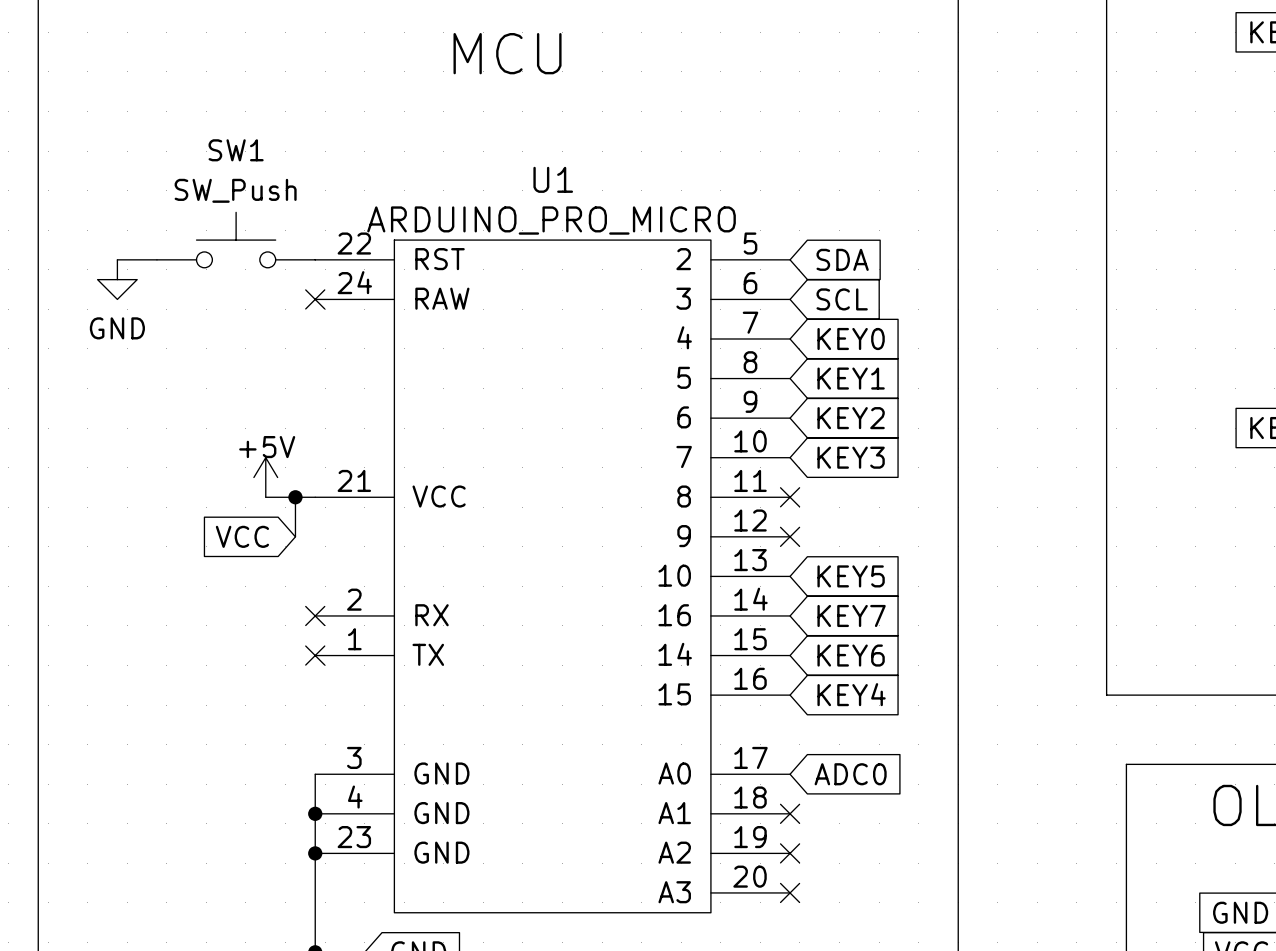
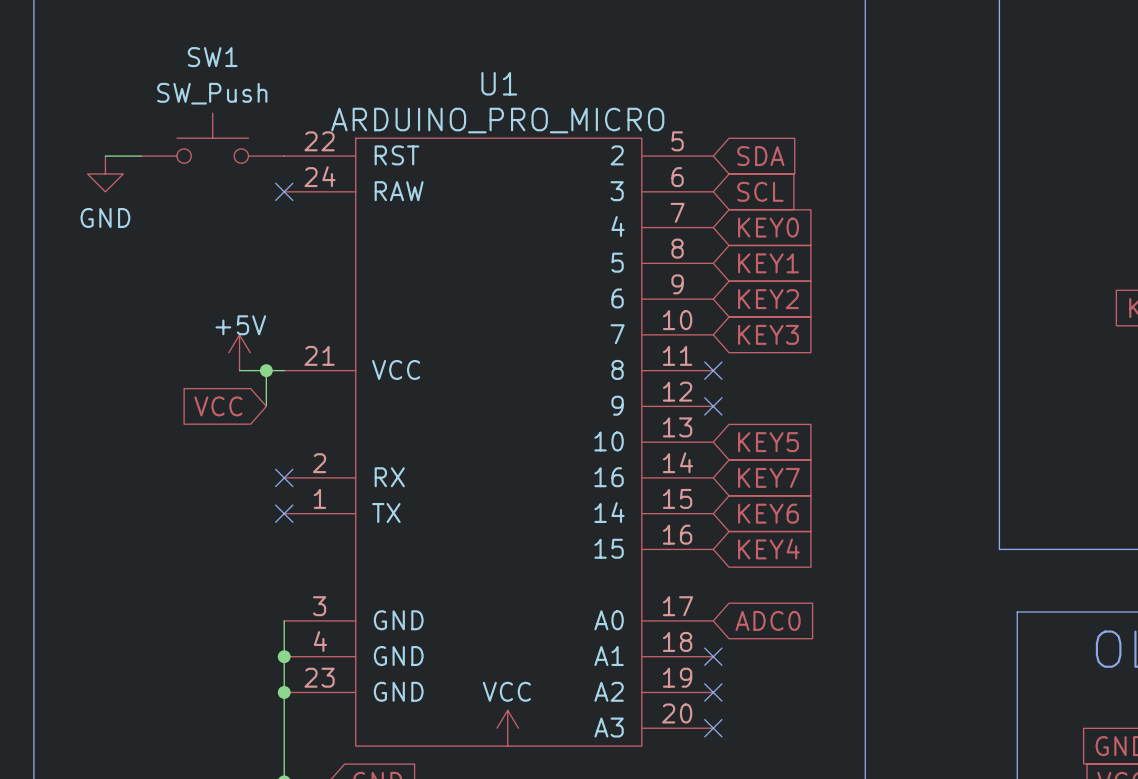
power symbol: none -> VCC (507, 728)

